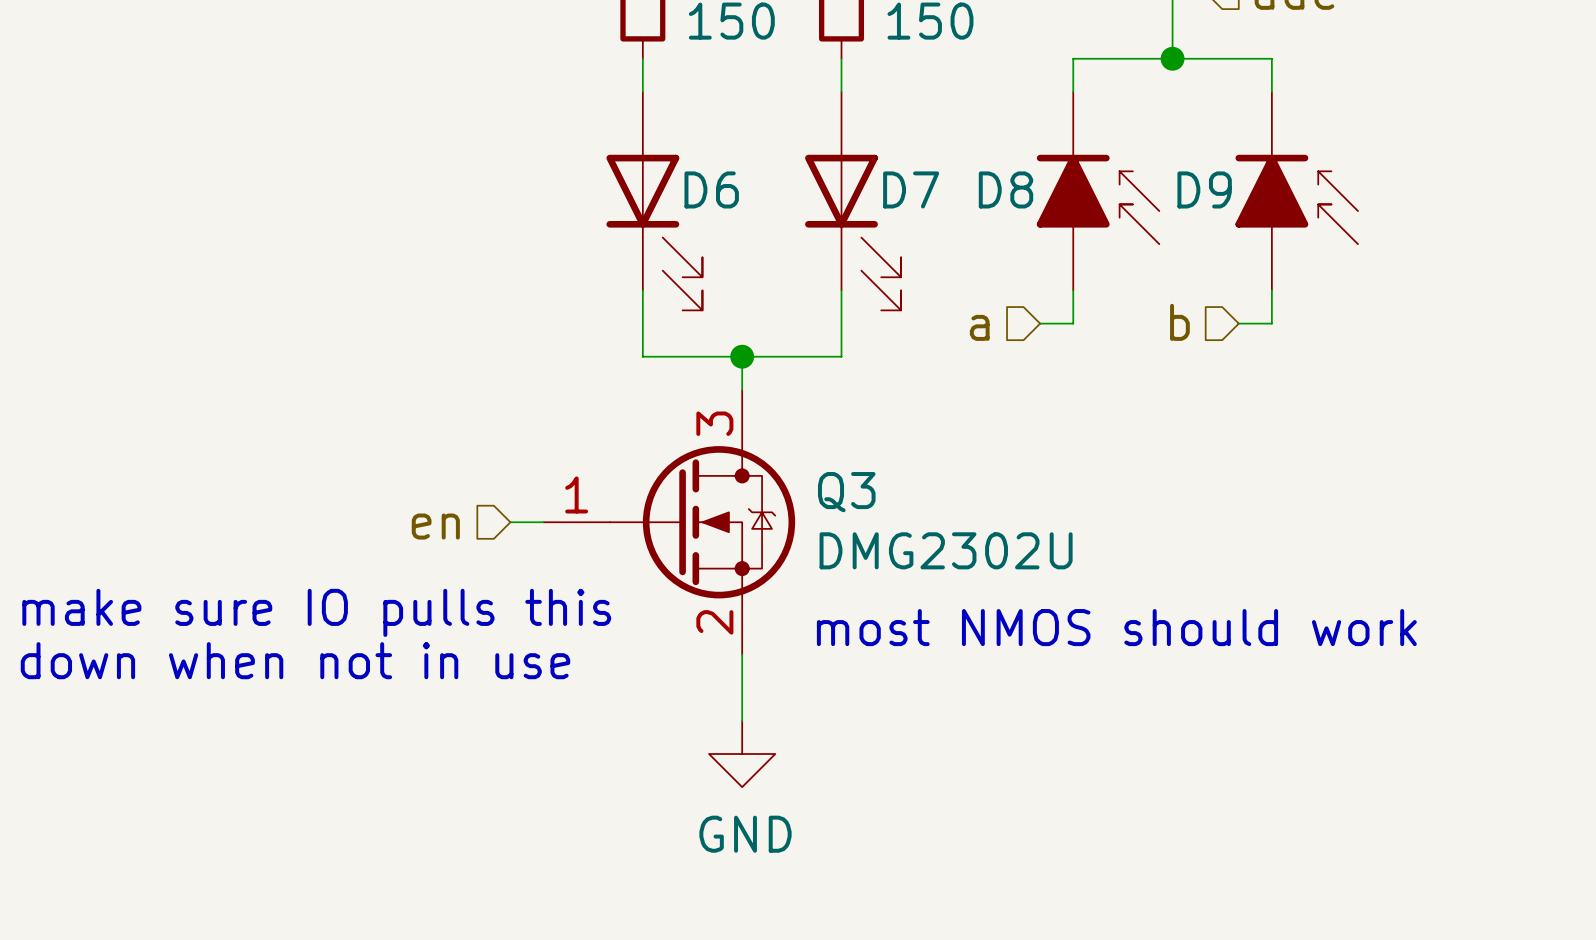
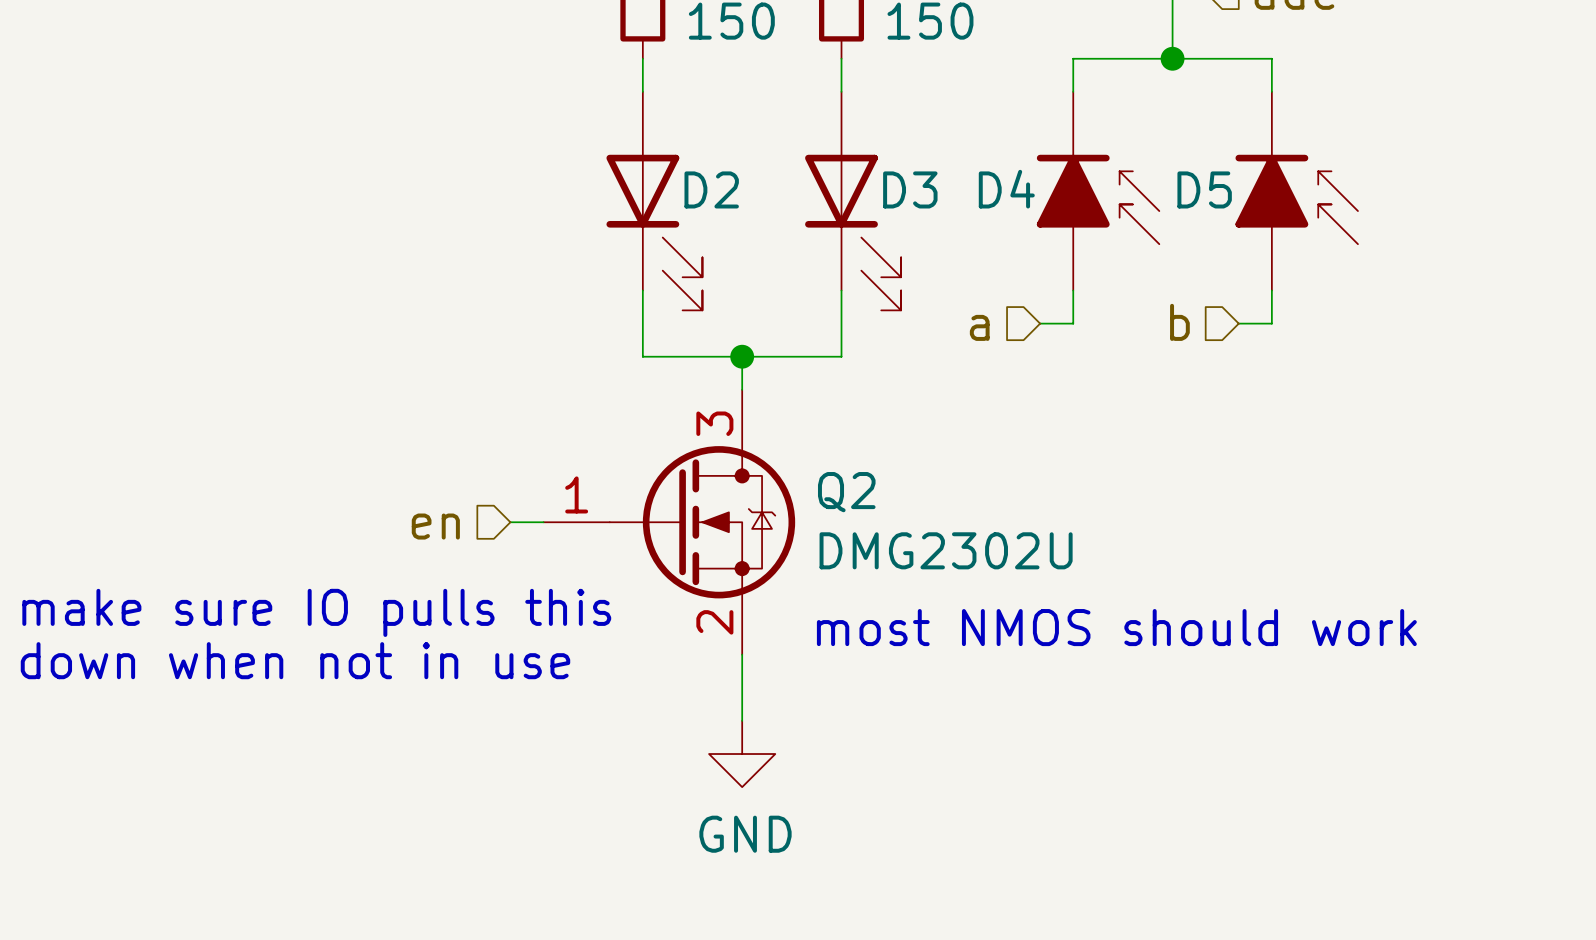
D6 name: D6 (711, 189) -> D2 (711, 189)
D7 name: D7 (911, 189) -> D3 (910, 189)
D8 name: D8 (1006, 189) -> D4 (1006, 189)
D9 name: D9 (1204, 189) -> D5 (1204, 189)
Q3 name: Q3 (846, 492) -> Q2 (846, 492)

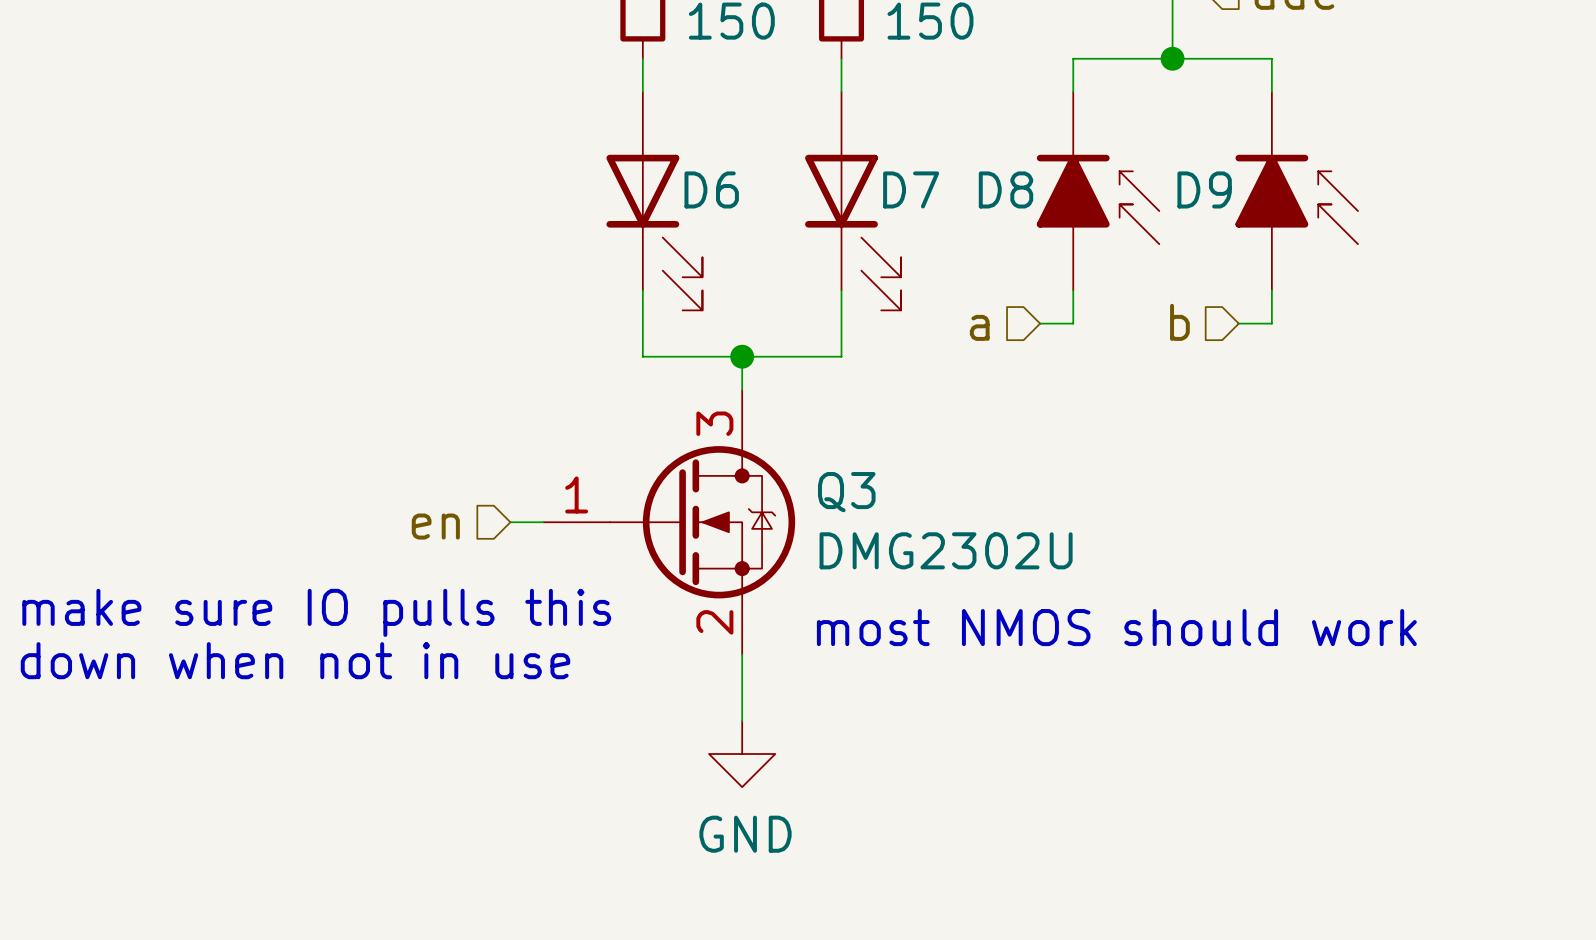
D2 name: D2 (711, 189) -> D6 (711, 189)
D3 name: D3 (910, 189) -> D7 (911, 189)
D4 name: D4 (1006, 189) -> D8 (1006, 189)
D5 name: D5 (1204, 189) -> D9 (1204, 189)
Q2 name: Q2 (846, 492) -> Q3 (846, 492)

